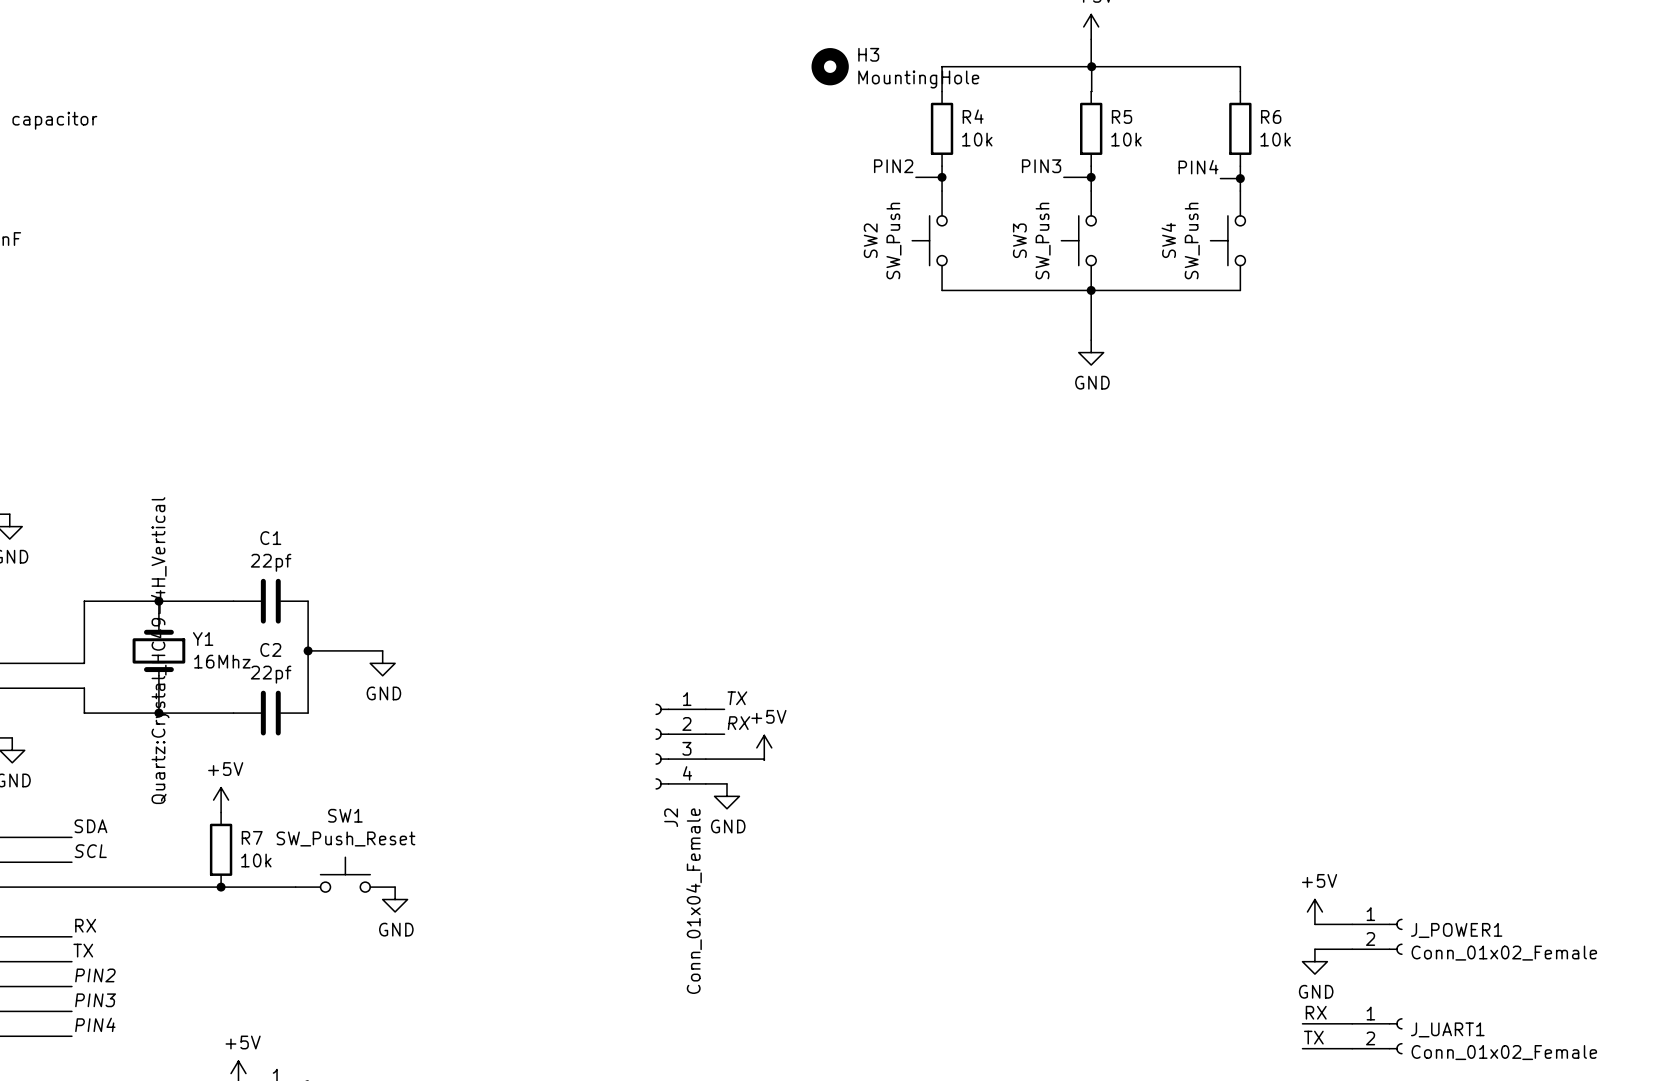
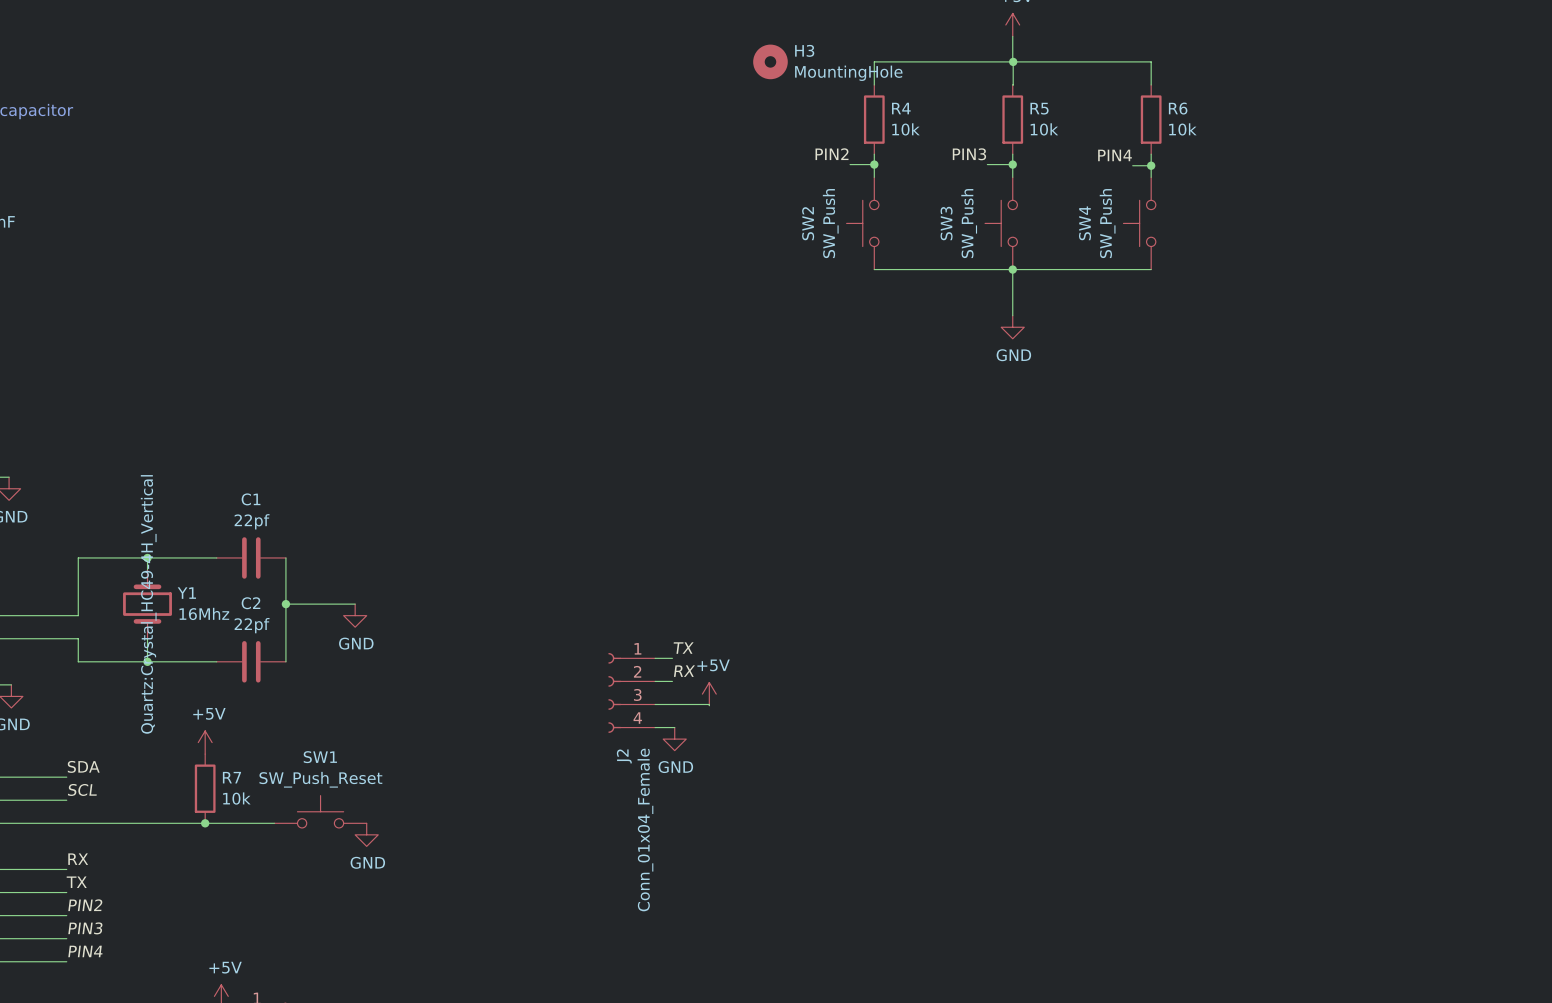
power symbol: +5V (1314, 911) -> none
wire: (1314, 924) (1352, 924) -> none
J_POWER1: Conn_01x02_Female (1377, 936) -> none
wire: (1314, 949) (1352, 949) -> none
power symbol: GND (1314, 961) -> none
label: RX (1316, 1012) -> none
wire: (1302, 1023) (1352, 1023) -> none
J_UART1: Conn_01x02_Female (1377, 1036) -> none
label: TX (1313, 1037) -> none
wire: (1302, 1048) (1352, 1048) -> none

